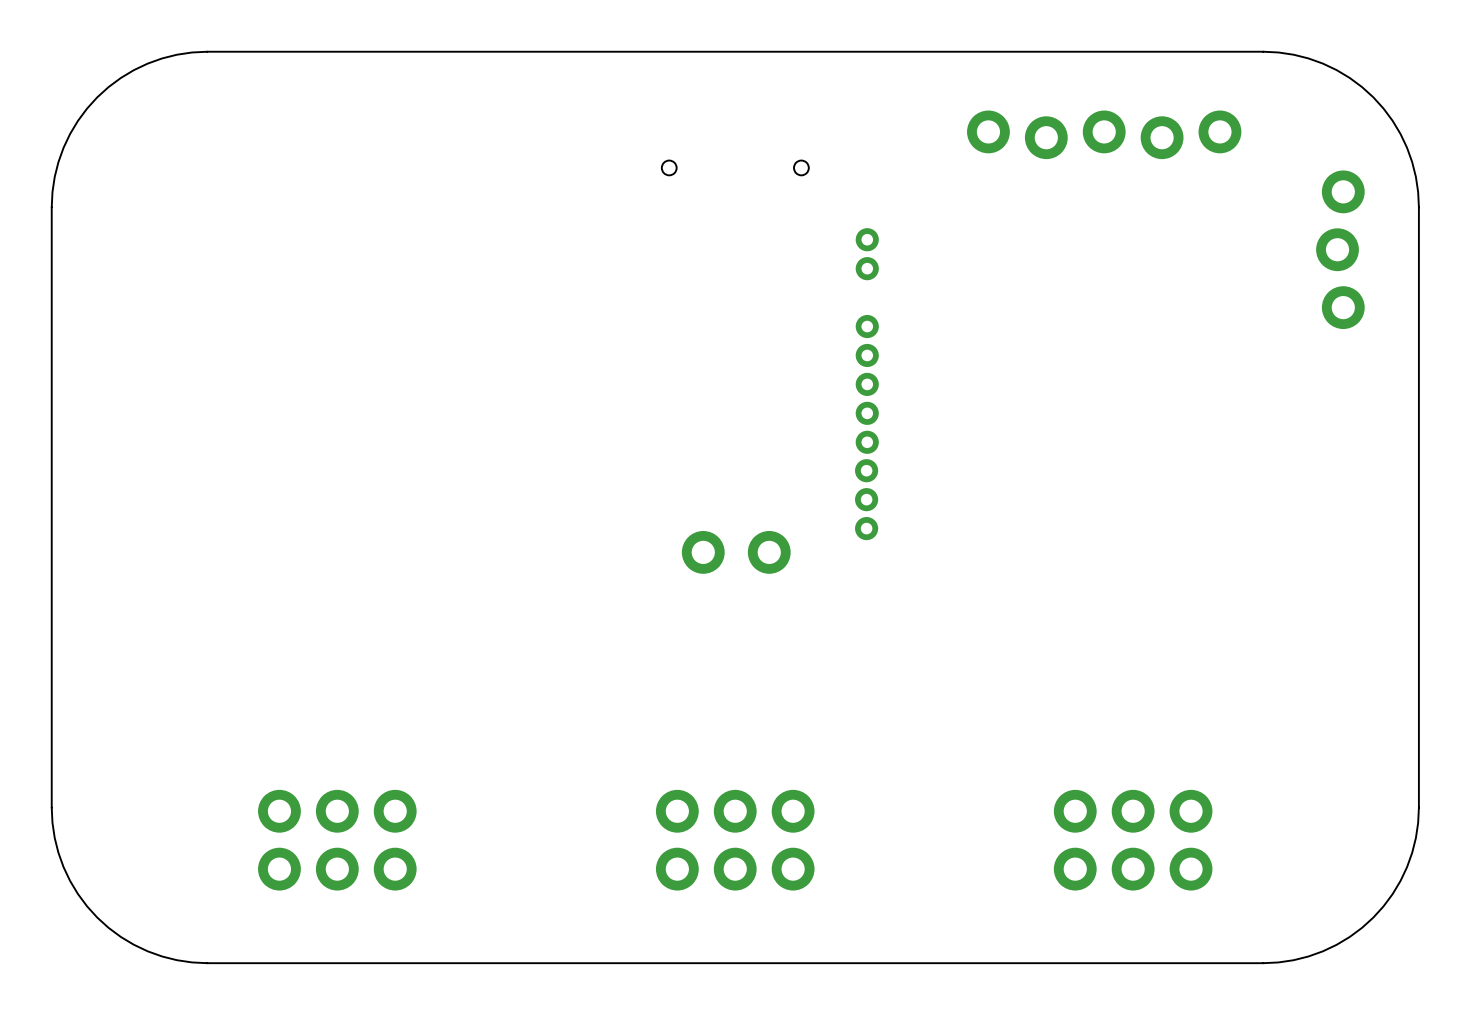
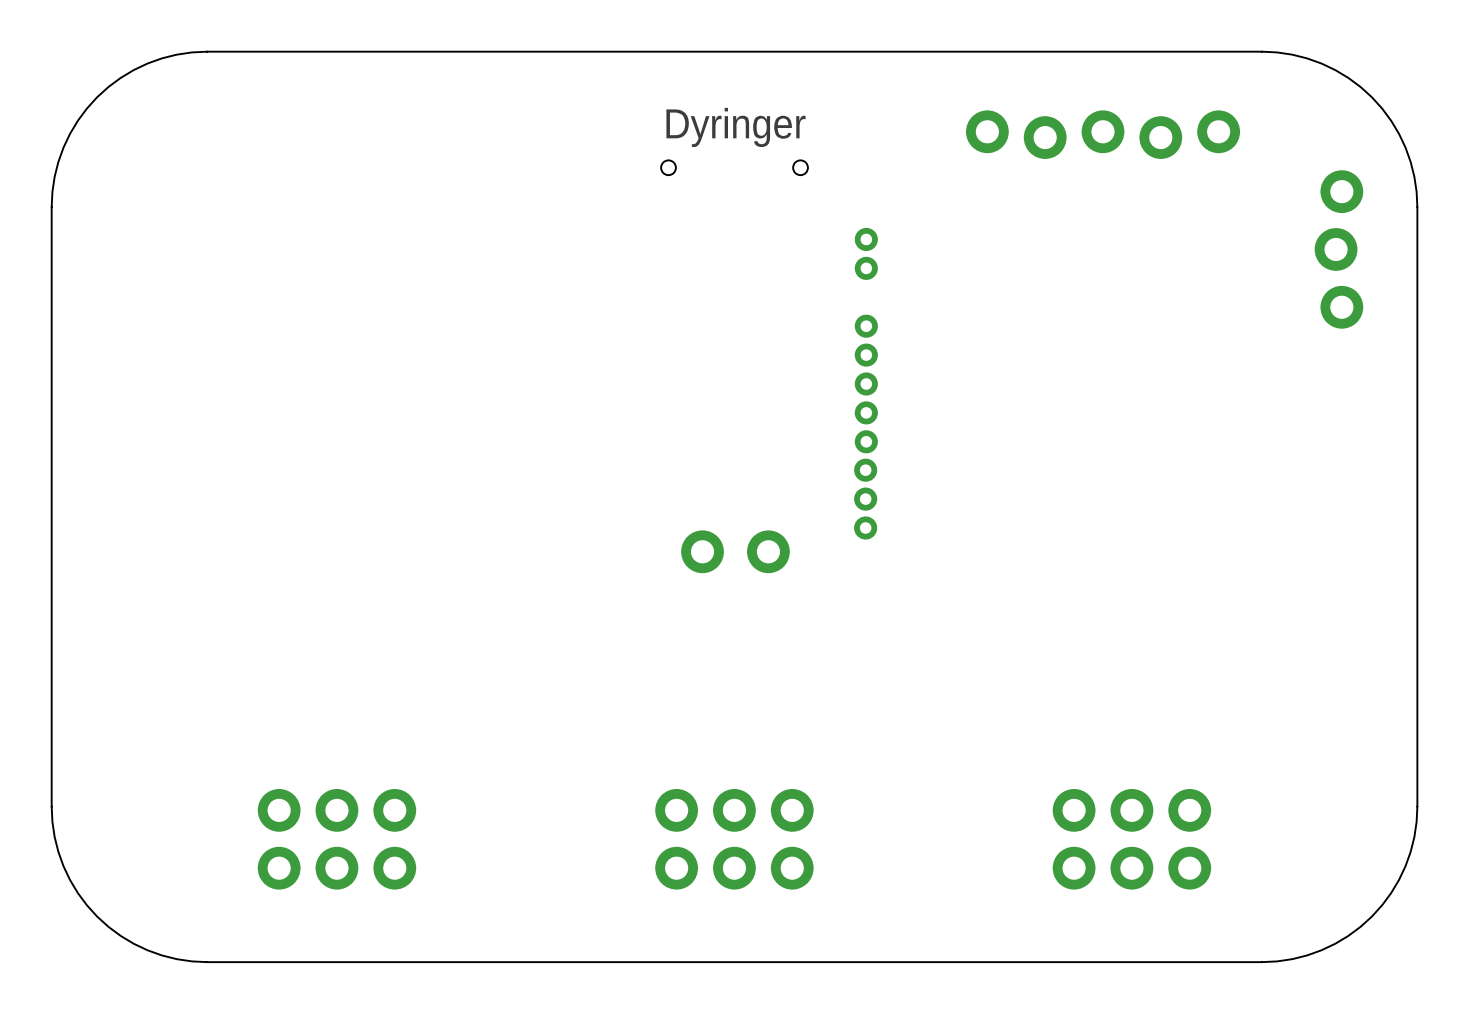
text: none -> Dyringer (736, 127)

